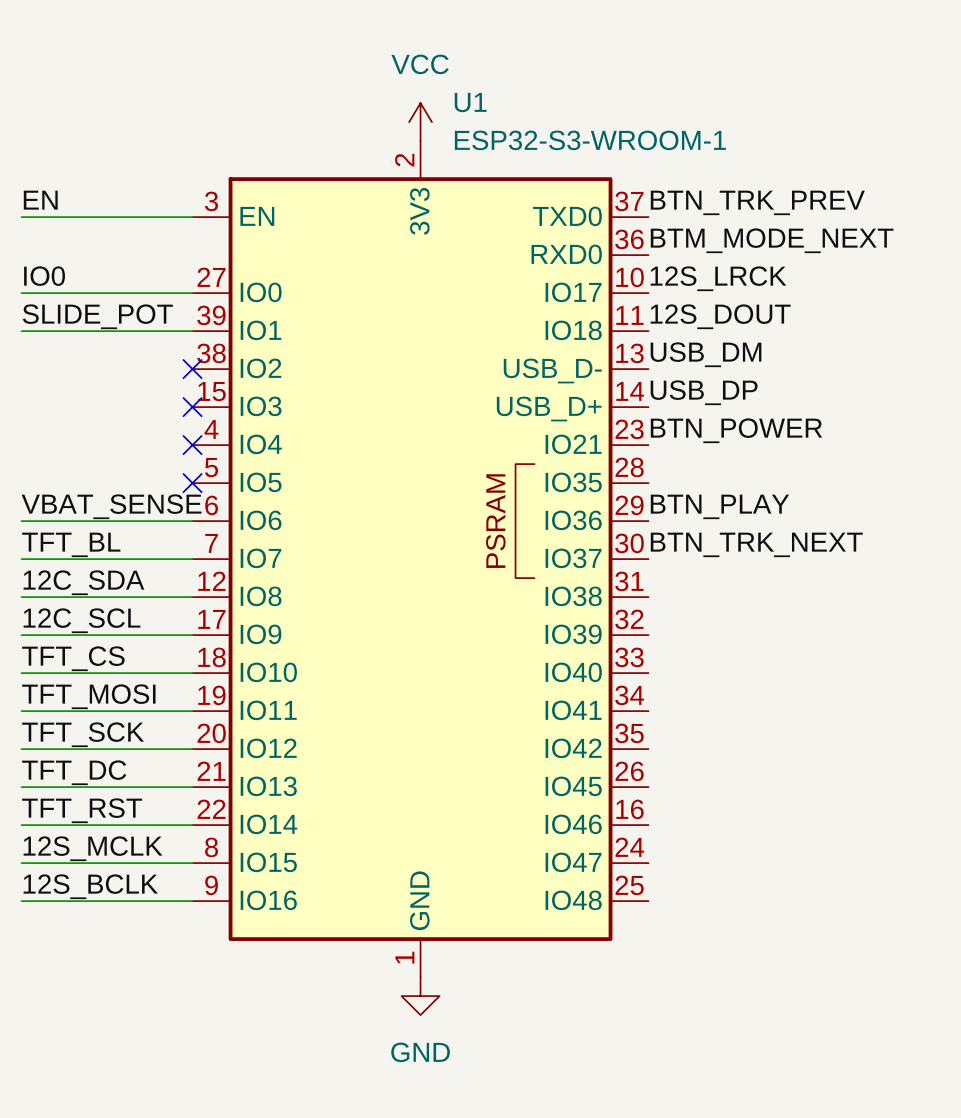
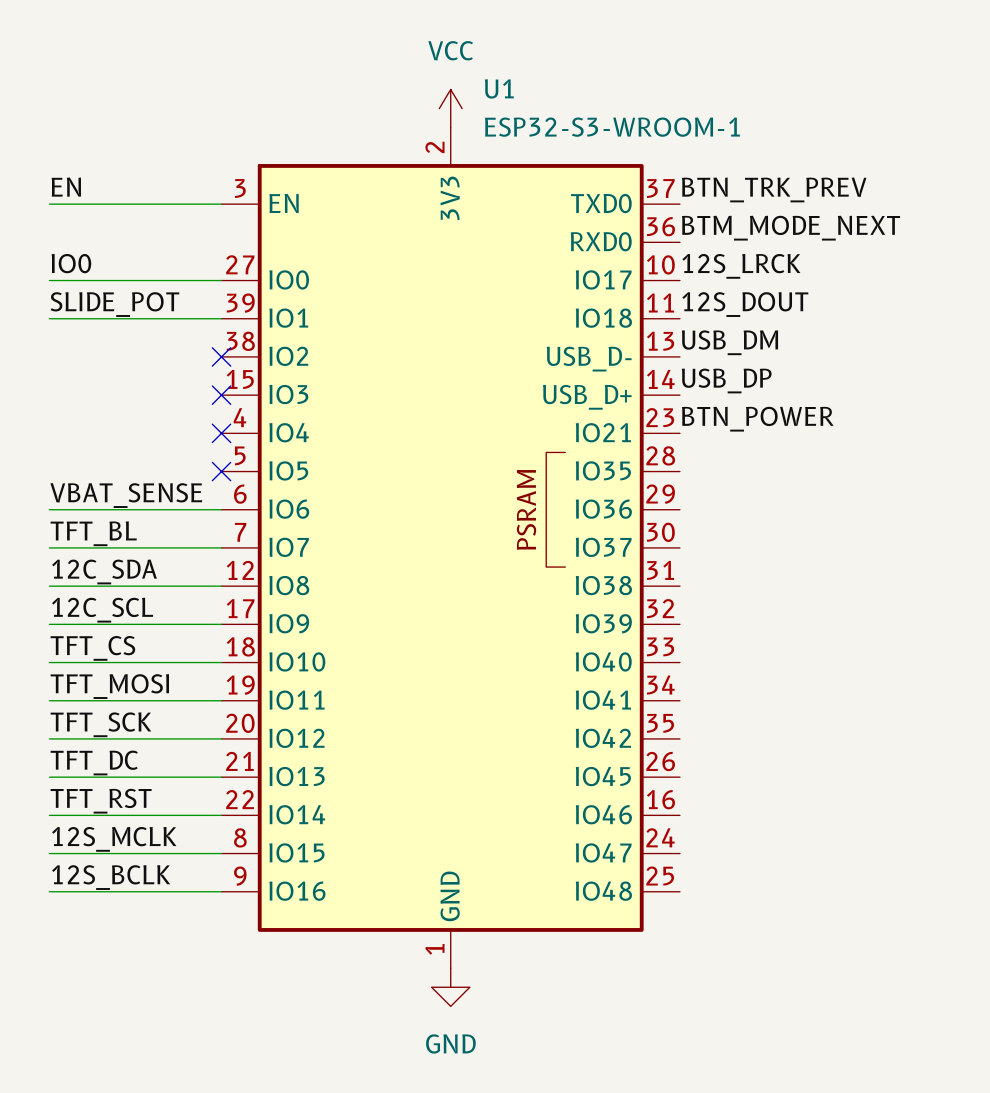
label: BTN_PLAY (719, 506) -> none
label: BTN_TRK_NEXT (756, 544) -> none

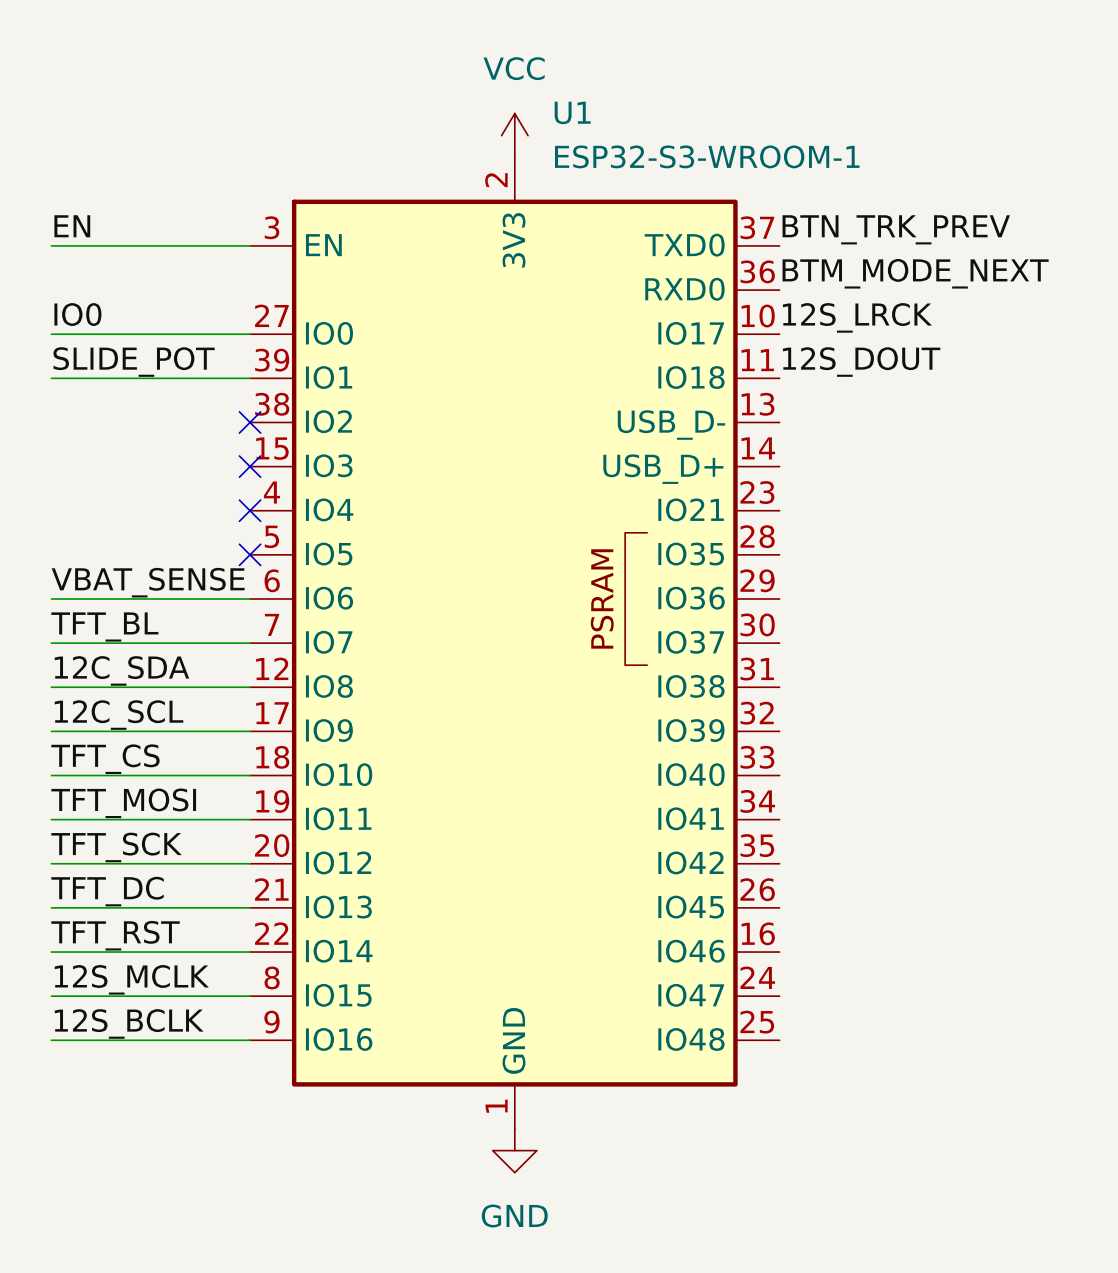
label: USB_DM (729, 342) -> none
label: USB_DP (726, 380) -> none
label: BTN_POWER (757, 419) -> none

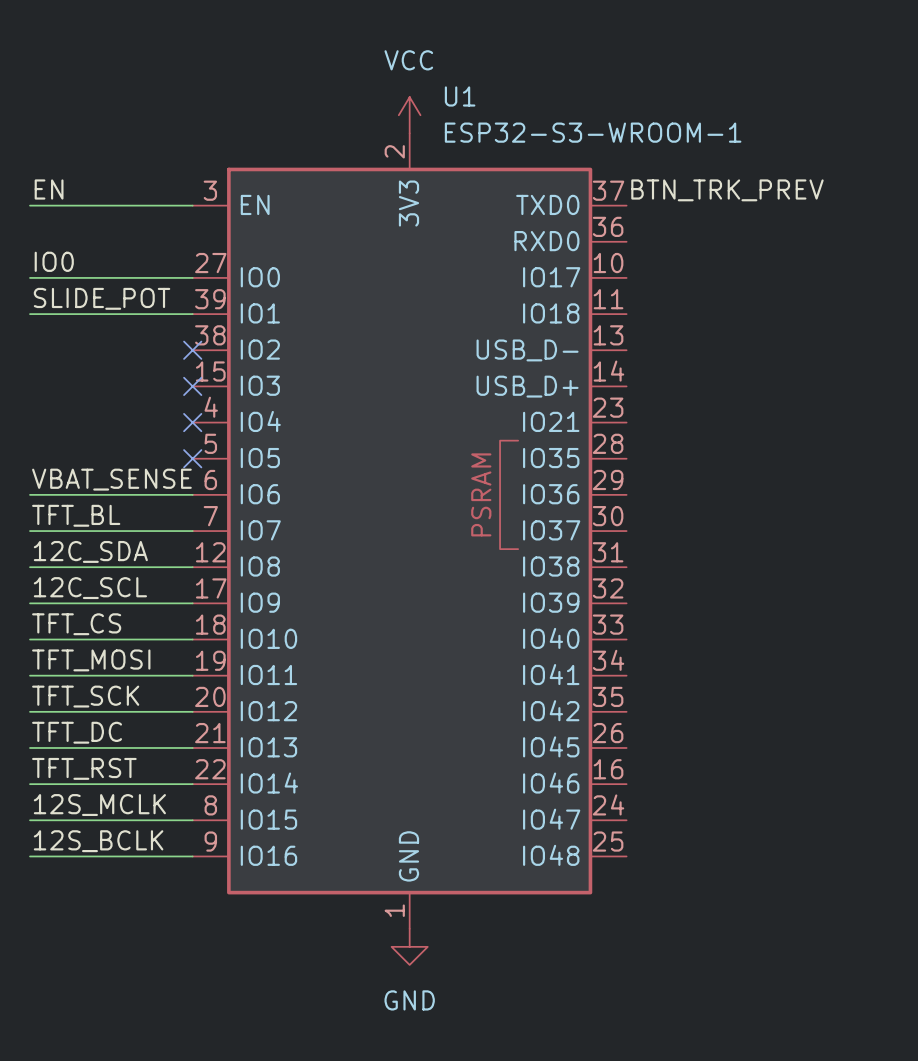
label: BTM_MODE_NEXT (915, 273) -> none
label: 12S_LRCK (857, 317) -> none
label: 12S_DOUT (861, 362) -> none

